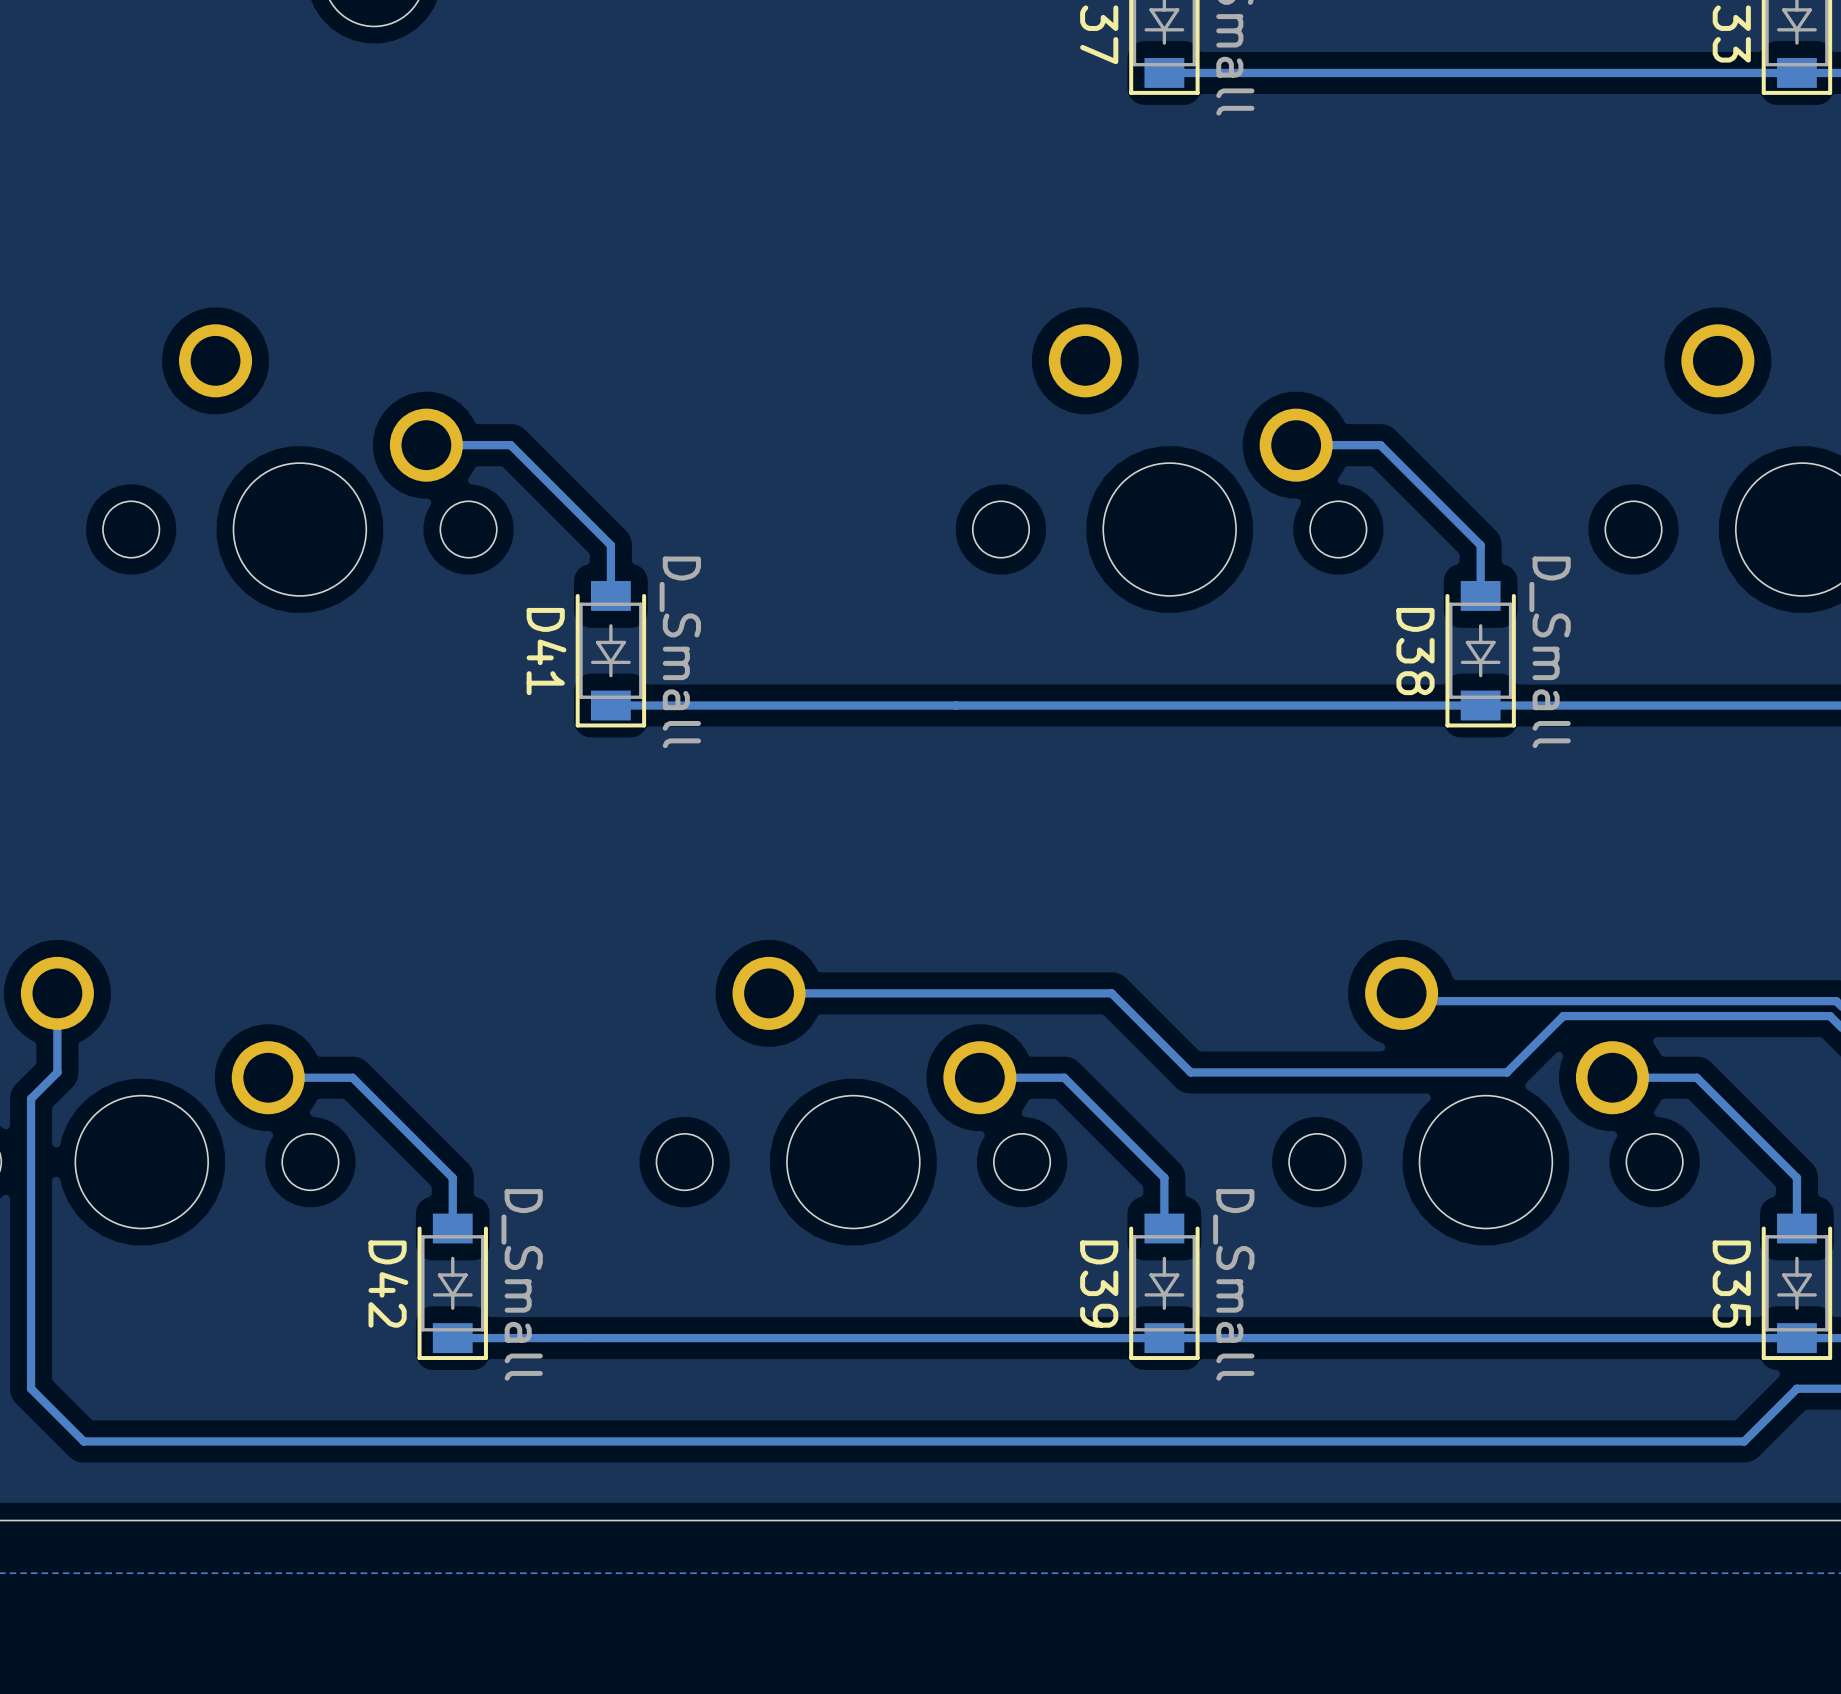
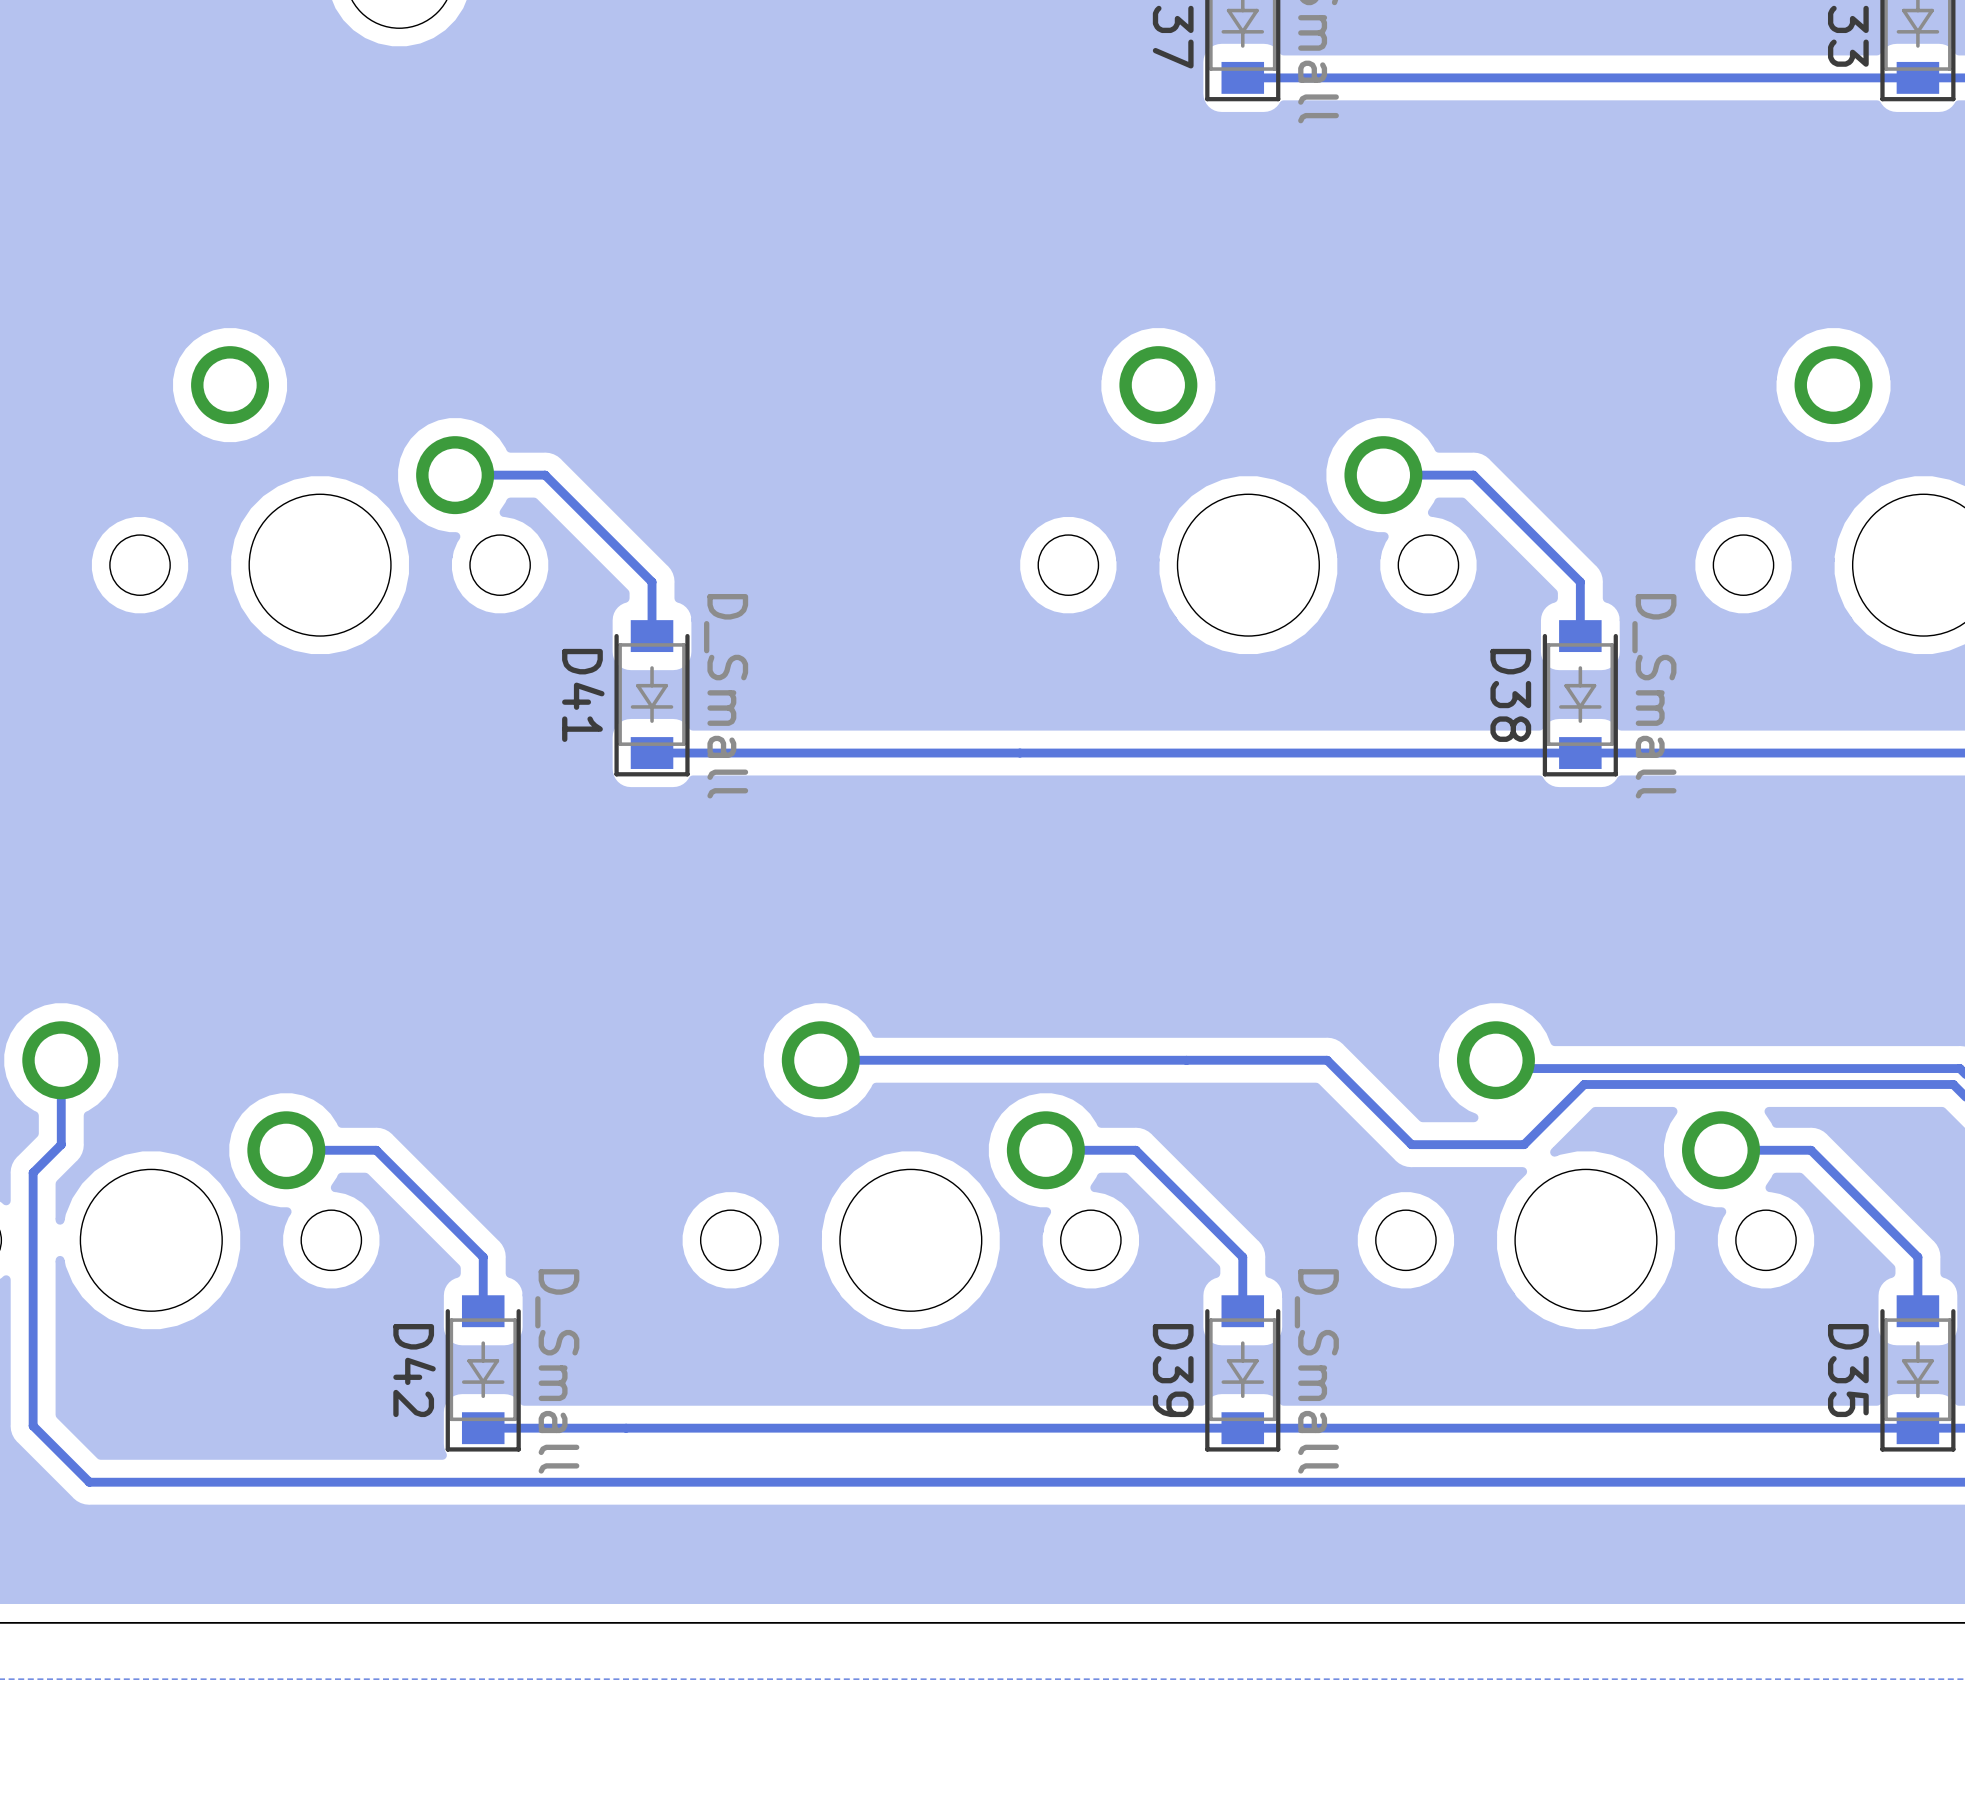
track: (1111, 993) (1190, 1072) (1322, 1072) -> (1186, 1060) (1327, 1060) (1411, 1144)
track: (1563, 1016) (1507, 1072) (1427, 1072) -> (1668, 1084) (1584, 1084) (1524, 1144)
track: (31, 1336) (31, 1388) (83, 1441) (1744, 1441) (1796, 1388) -> (33, 1425) (89, 1482) (1917, 1482)

